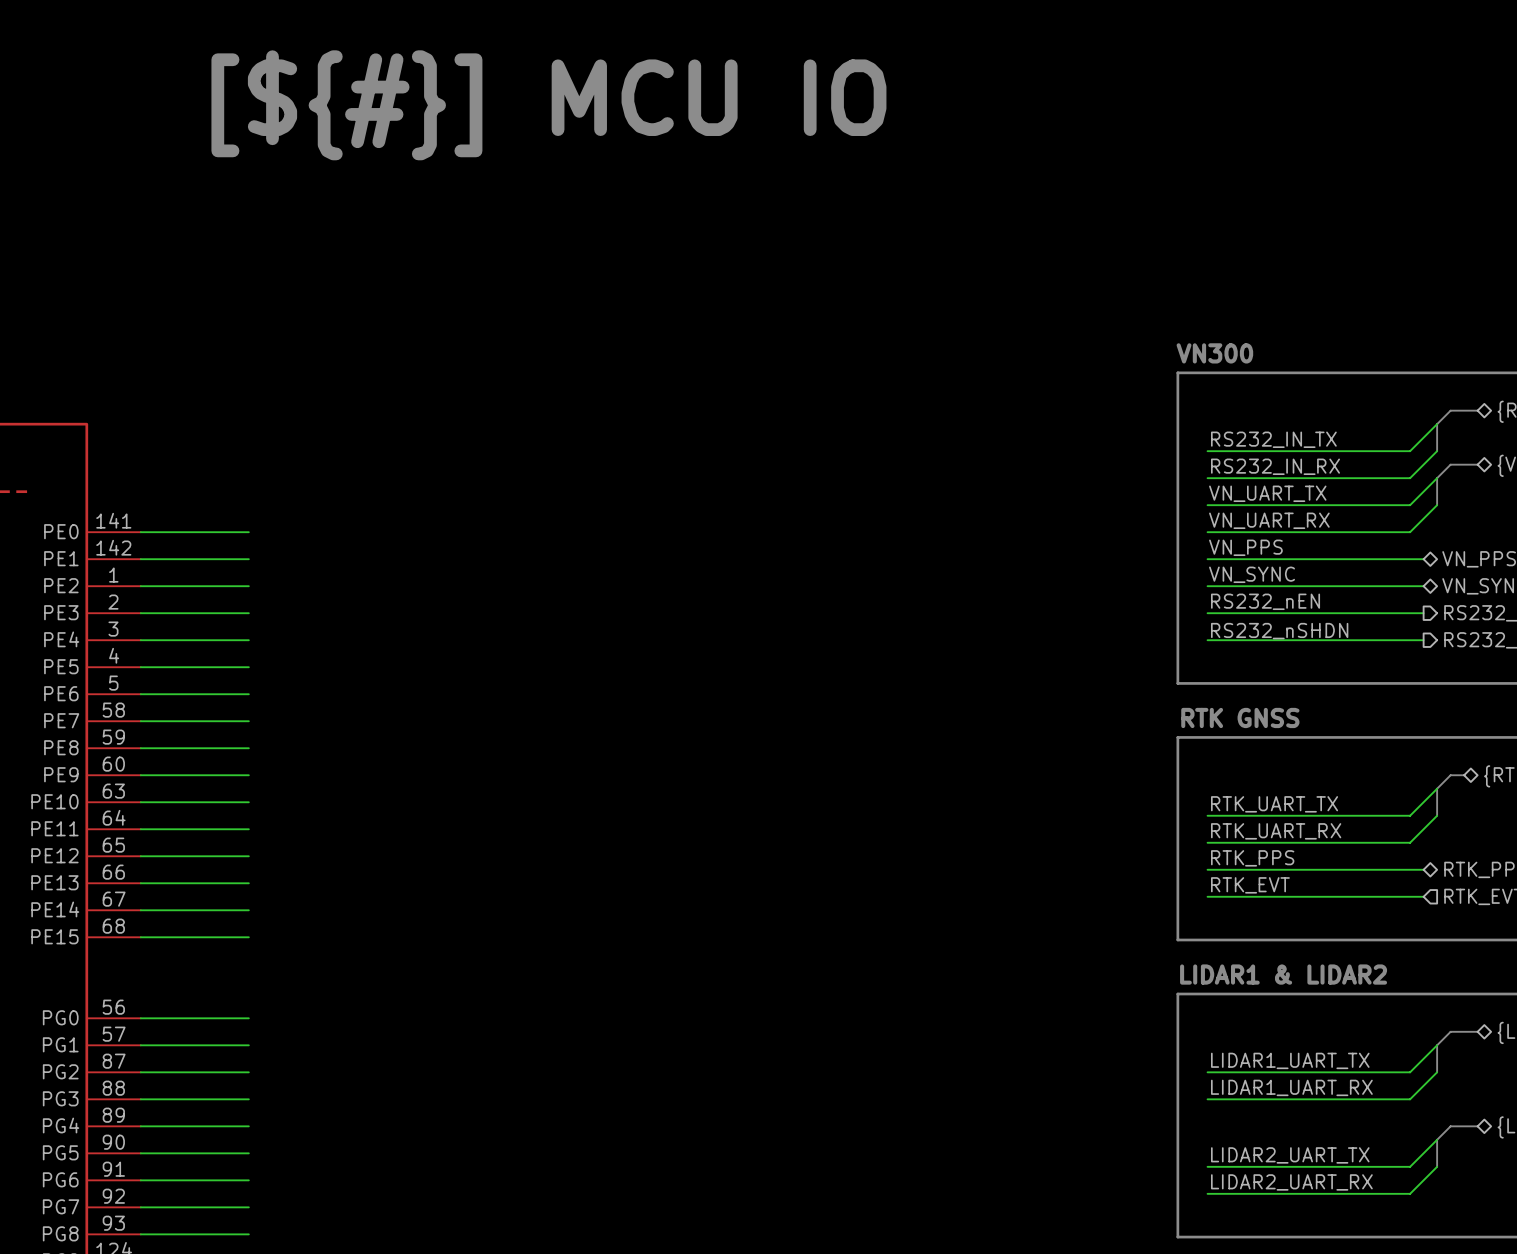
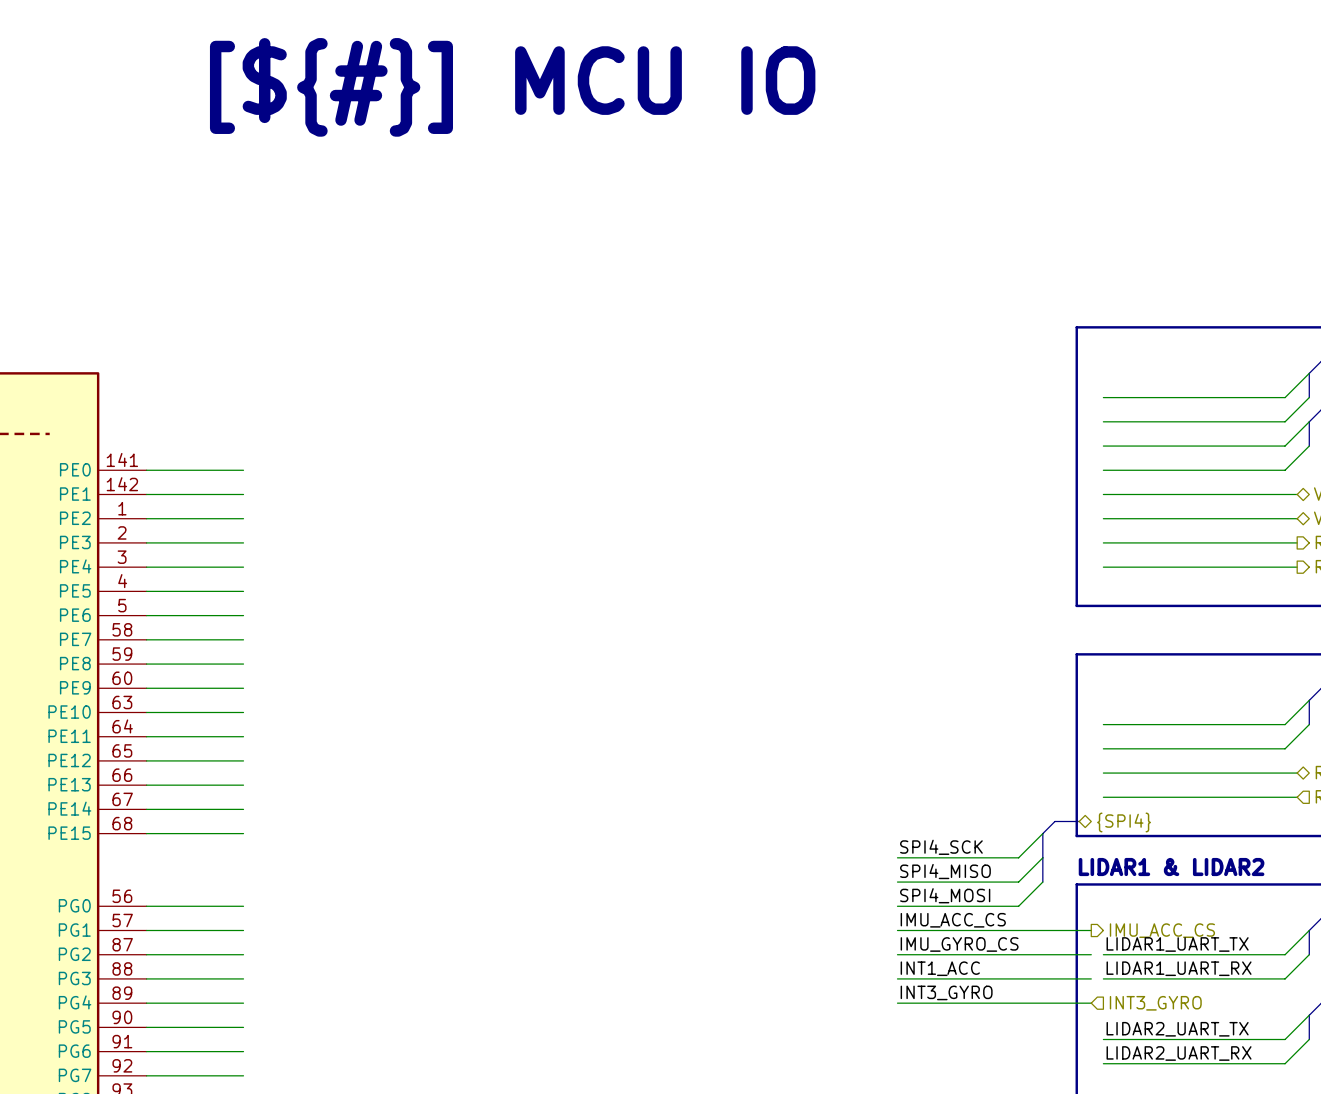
text: VN300 (1214, 353) -> none
label: RS232_IN_TX (1273, 439) -> none
label: RS232_IN_RX (1275, 466) -> none
label: VN_UART_TX (1267, 493) -> none
label: VN_UART_RX (1269, 520) -> none
label: VN_PPS (1245, 547) -> none
label: VN_SYNC (1252, 574) -> none
label: RS232_nEN (1265, 601) -> none
label: RS232_nSHDN (1279, 631) -> none
text: RTK GNSS (1240, 717) -> none
label: RTK_UART_TX (1274, 804) -> none
label: RTK_UART_RX (1276, 831) -> none
label: RTK_PPS (1252, 858) -> none
label: RTK_EVT (1250, 885) -> none
bus: none -> (1079, 821) (1054, 821) (1042, 833) (1042, 882)
hierarchical label: none -> {SPI4} (1124, 822)
wire: none -> (1042, 833) (1018, 857) (897, 857)
label: none -> SPI4_SCK (941, 847)
wire: none -> (1042, 857) (1018, 882) (897, 882)
label: none -> SPI4_MISO (945, 871)
wire: none -> (1042, 882) (1018, 906) (897, 906)
label: none -> SPI4_MOSI (945, 895)
label: none -> IMU_ACC_CS (953, 920)
wire: none -> (897, 930) (1091, 930)
hierarchical label: none -> IMU_ACC_CS (1162, 930)
label: none -> IMU_GYRO_CS (959, 944)
wire: none -> (897, 954) (1091, 954)
label: none -> INT1_ACC (940, 968)
wire: none -> (897, 978) (1091, 978)
label: none -> INT3_GYRO (946, 992)
wire: none -> (897, 1003) (1091, 1003)
hierarchical label: none -> INT3_GYRO (1155, 1003)

